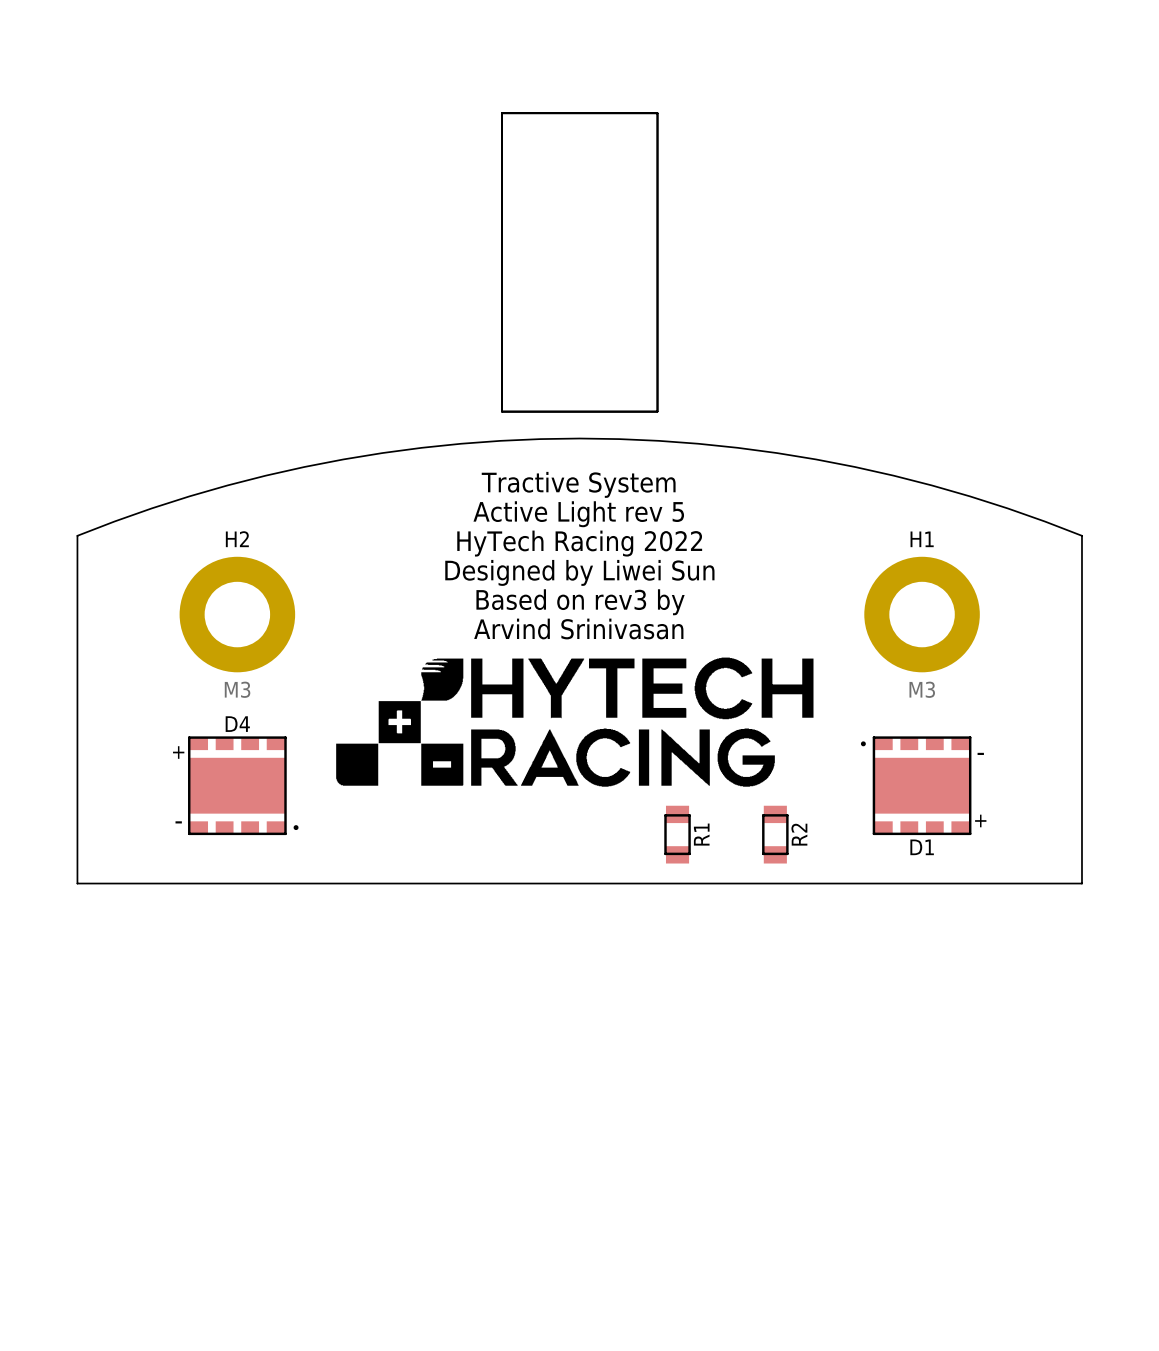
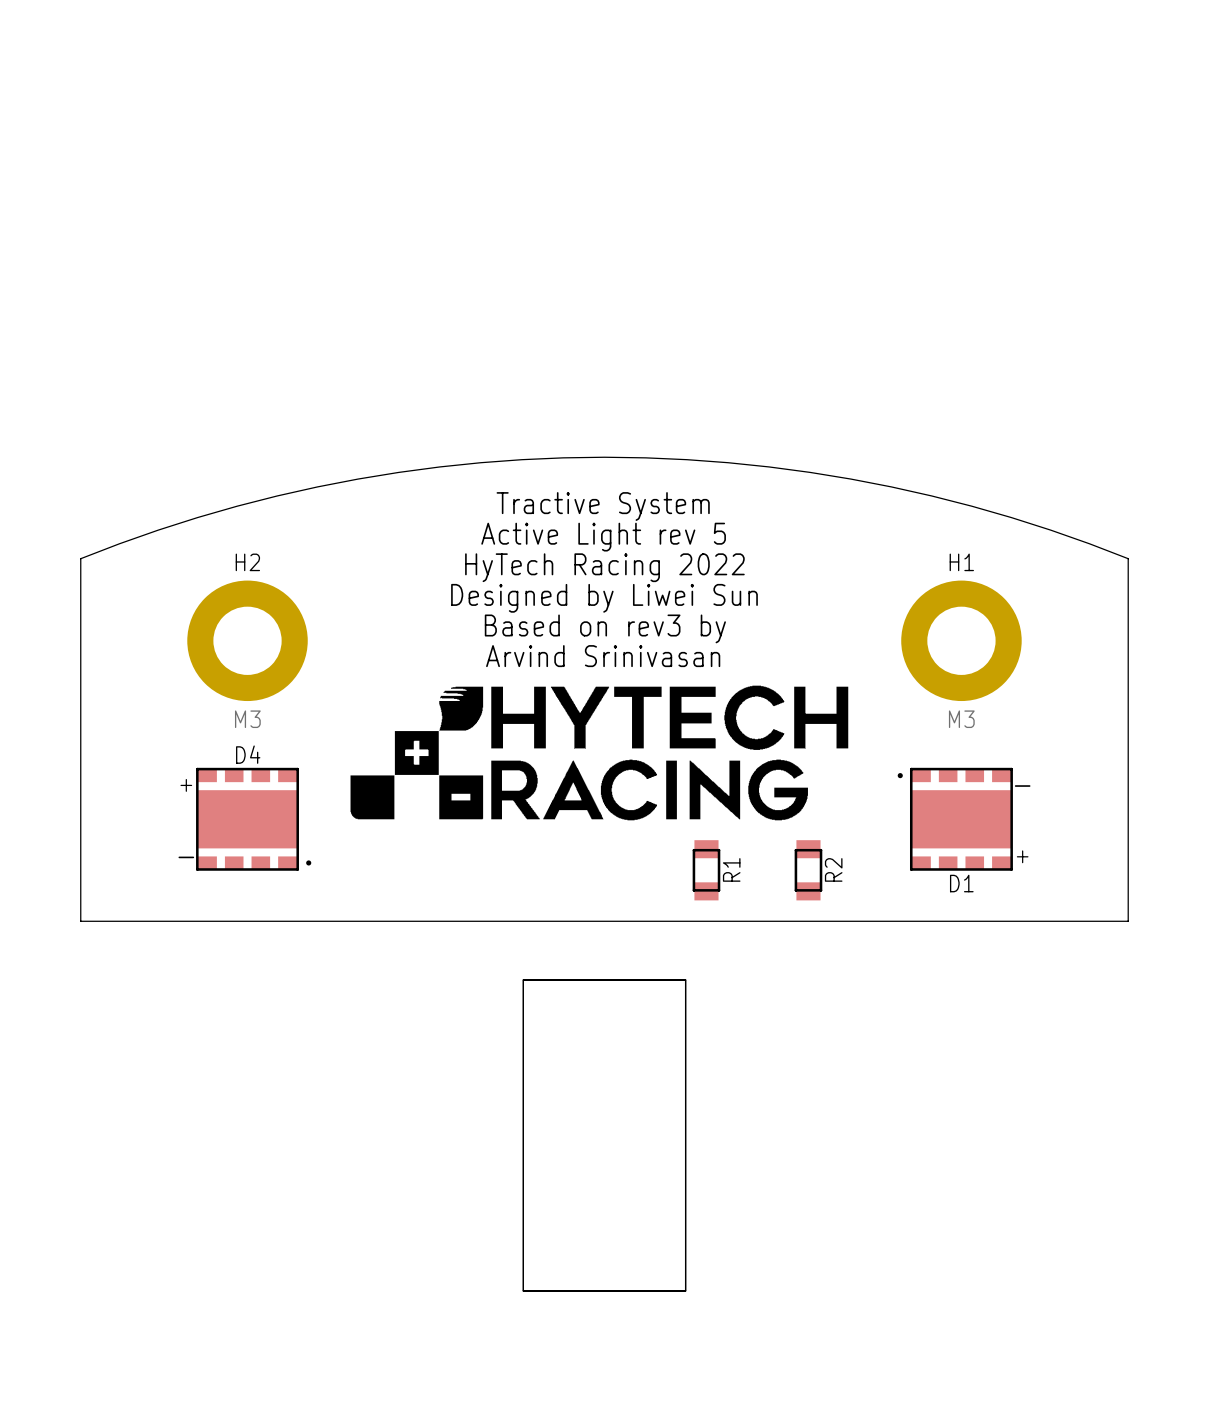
part: (579, 262) -> none
part: none -> (604, 1135)

